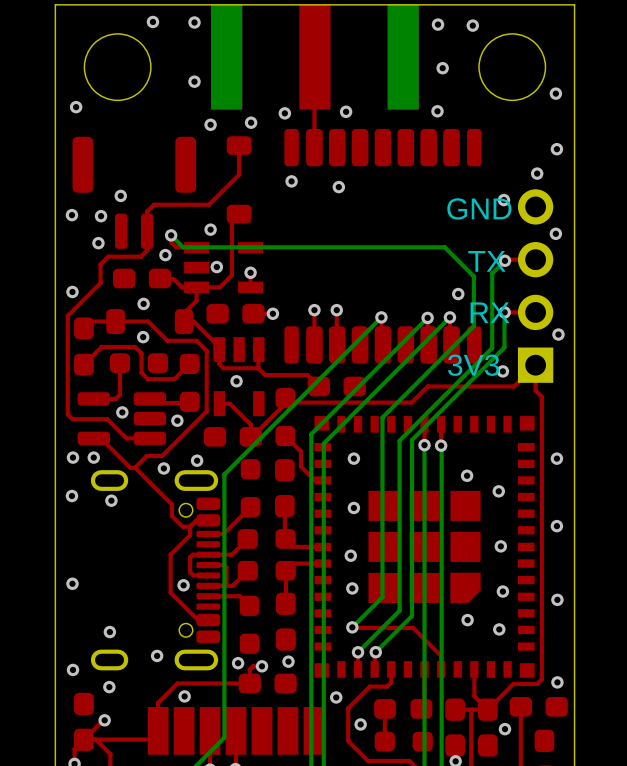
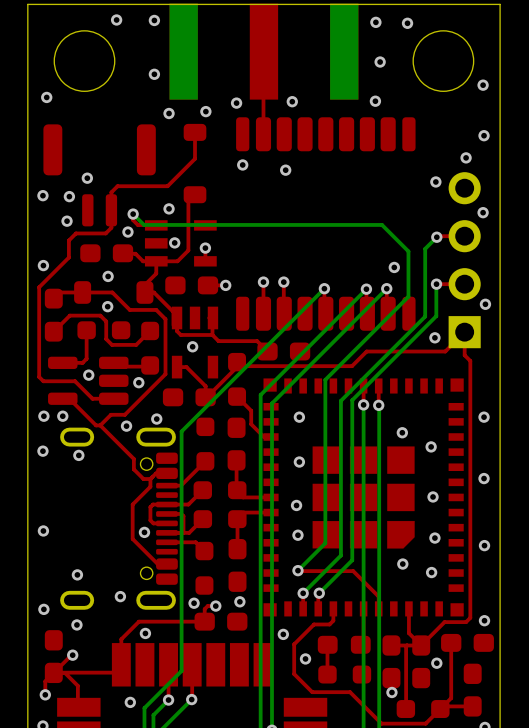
text: GND (479, 208) -> none
text: TX (486, 261) -> none
text: RX (490, 312) -> none
text: 3V3 (473, 365) -> none

